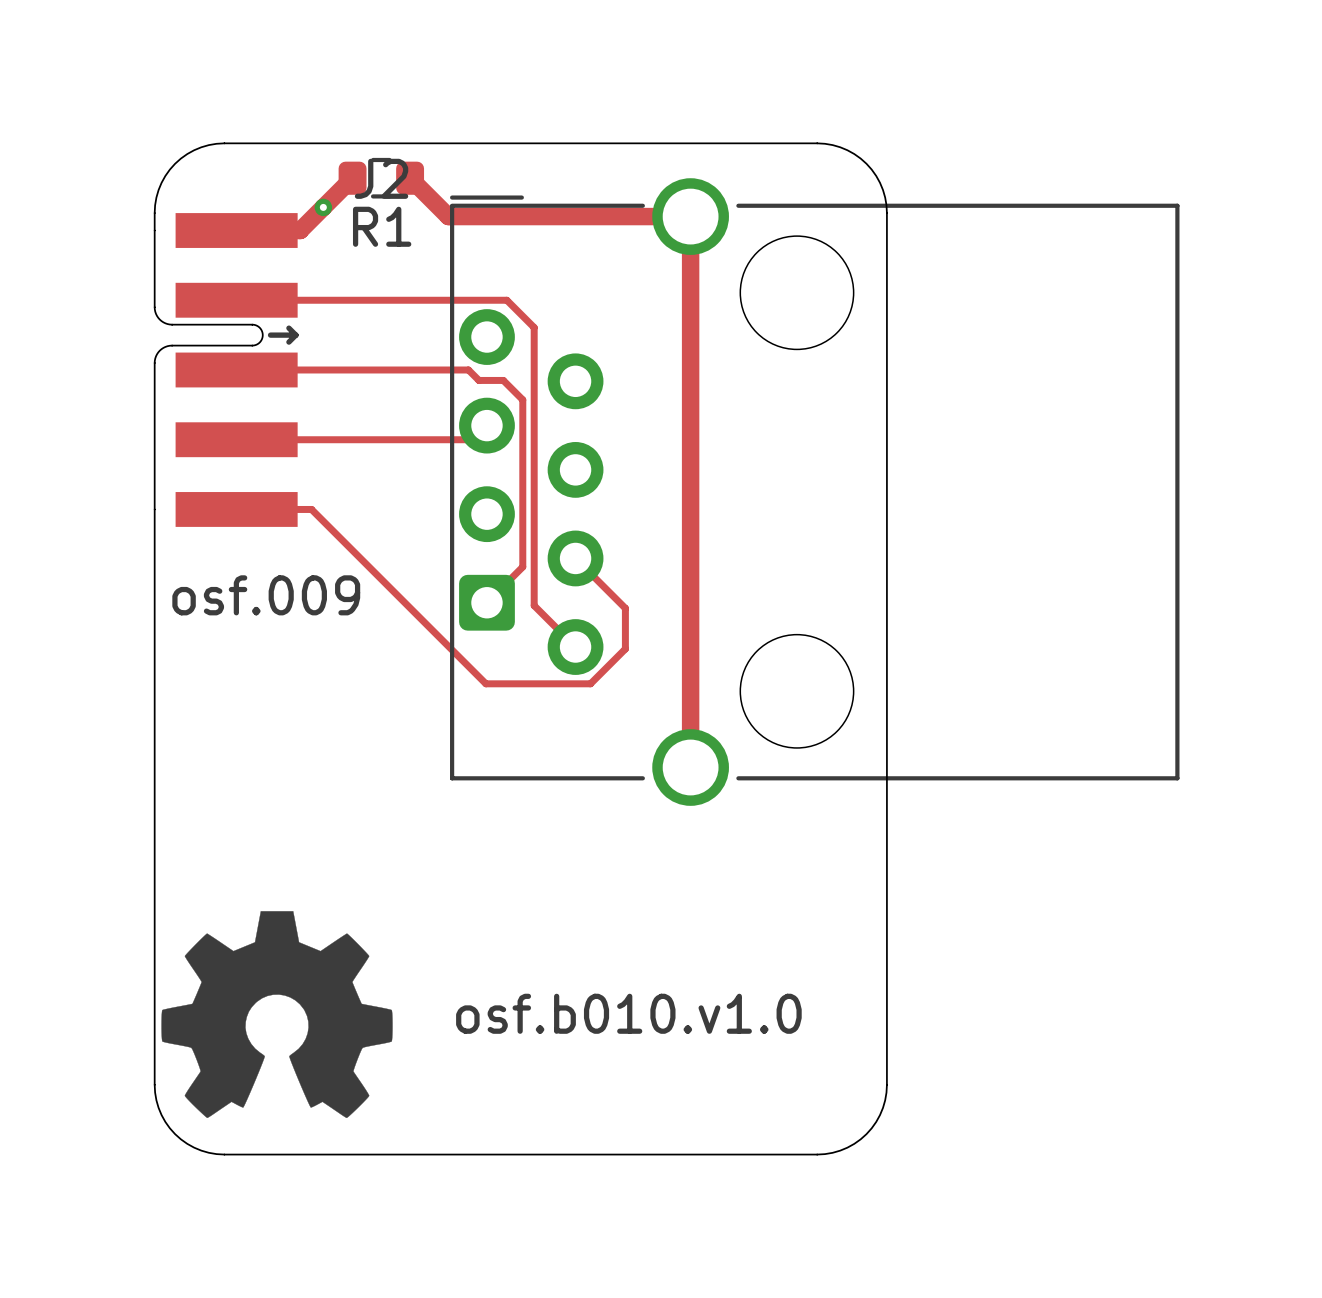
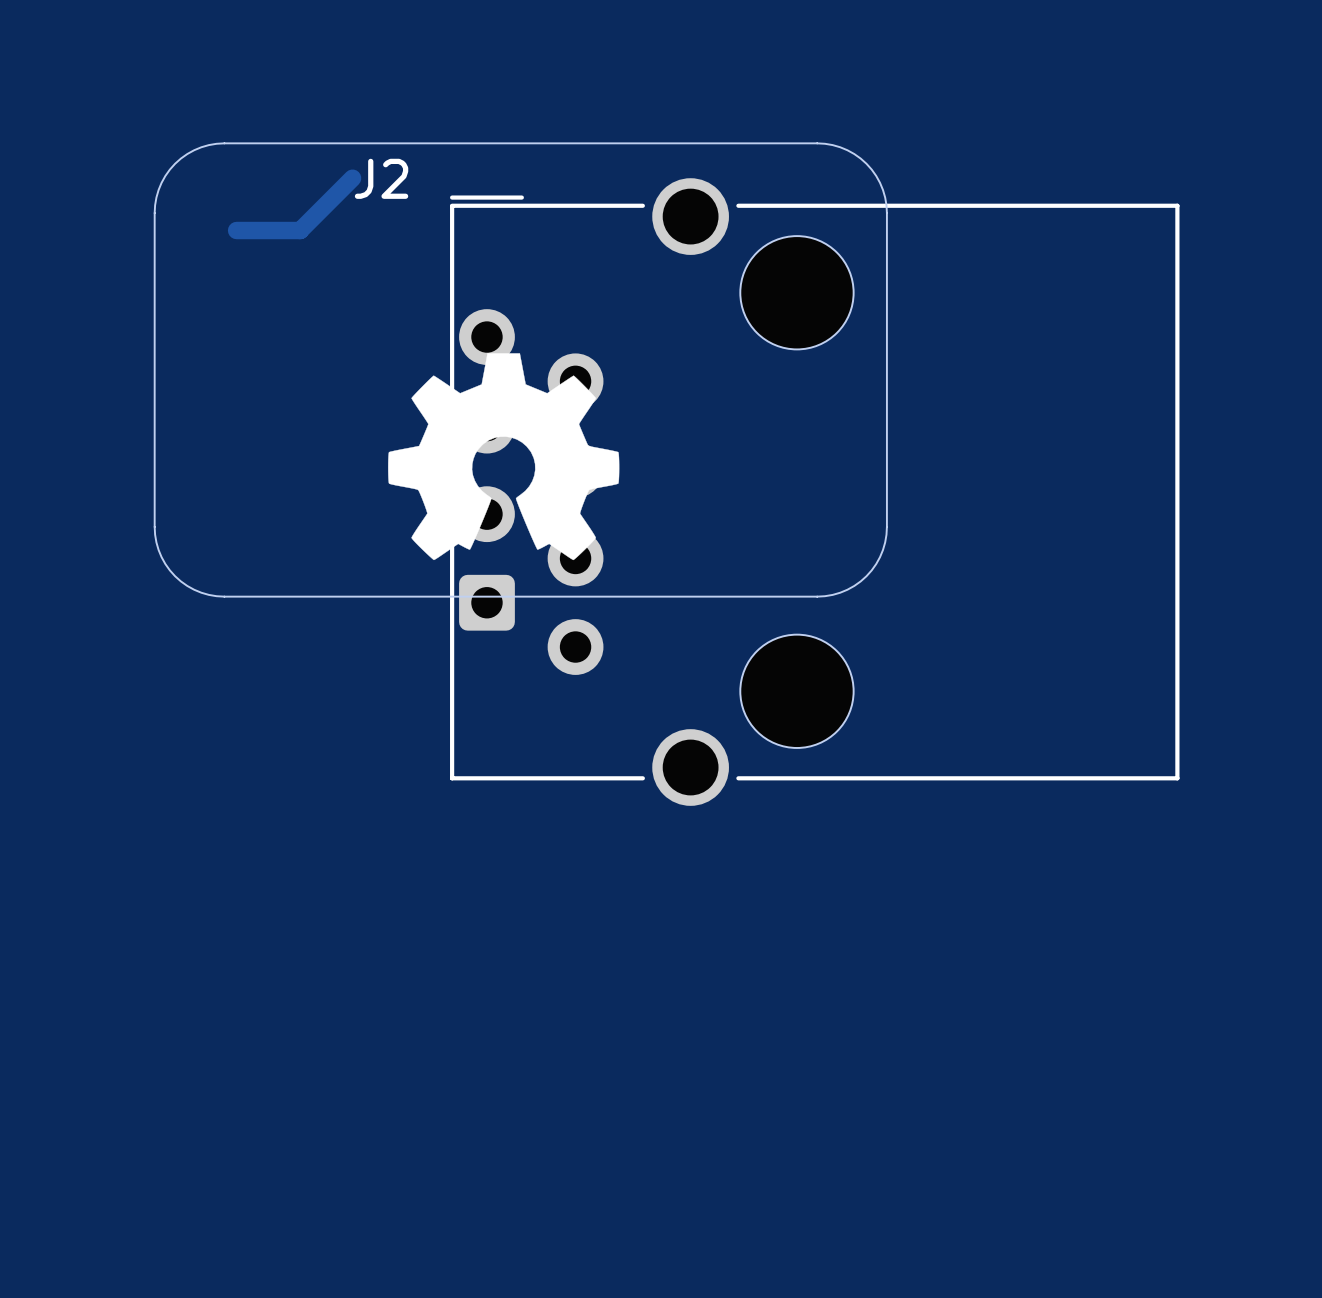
R1: (381, 178) -> none
track: (410, 178) (448, 216) (690, 216) (690, 767) -> none
via: (323, 207) -> none
board edge: none -> (154, 230) (154, 509)
track: (236, 300) (506, 300) (534, 327) (534, 605) (575, 647) -> none
part: (226, 369) -> none
track: (236, 369) (468, 369) (478, 380) (503, 380) (522, 399) (522, 566) (486, 602) -> none
track: (486, 425) (472, 439) (236, 439) -> none
track: (236, 509) (311, 509) (485, 683) (590, 683) (625, 648) (625, 608) (575, 558) -> none
board edge: (154, 526) (155, 1092) (158, 1107) (165, 1121) (180, 1139) (201, 1150) (224, 1154) (817, 1154) (832, 1152) (847, 1147) (866, 1134) (880, 1115) (885, 1100) (886, 1084) (886, 526) -> (154, 526) (156, 542) (161, 557) (175, 576) (187, 585) (201, 592) (224, 596) (825, 596) (847, 589) (860, 581) (871, 570) (883, 549) (886, 526)
text: osf.009 (266, 595) -> none
text: osf.b010.v1.0 (628, 1013) -> none
drawing position: (277, 1014) -> (503, 456)

